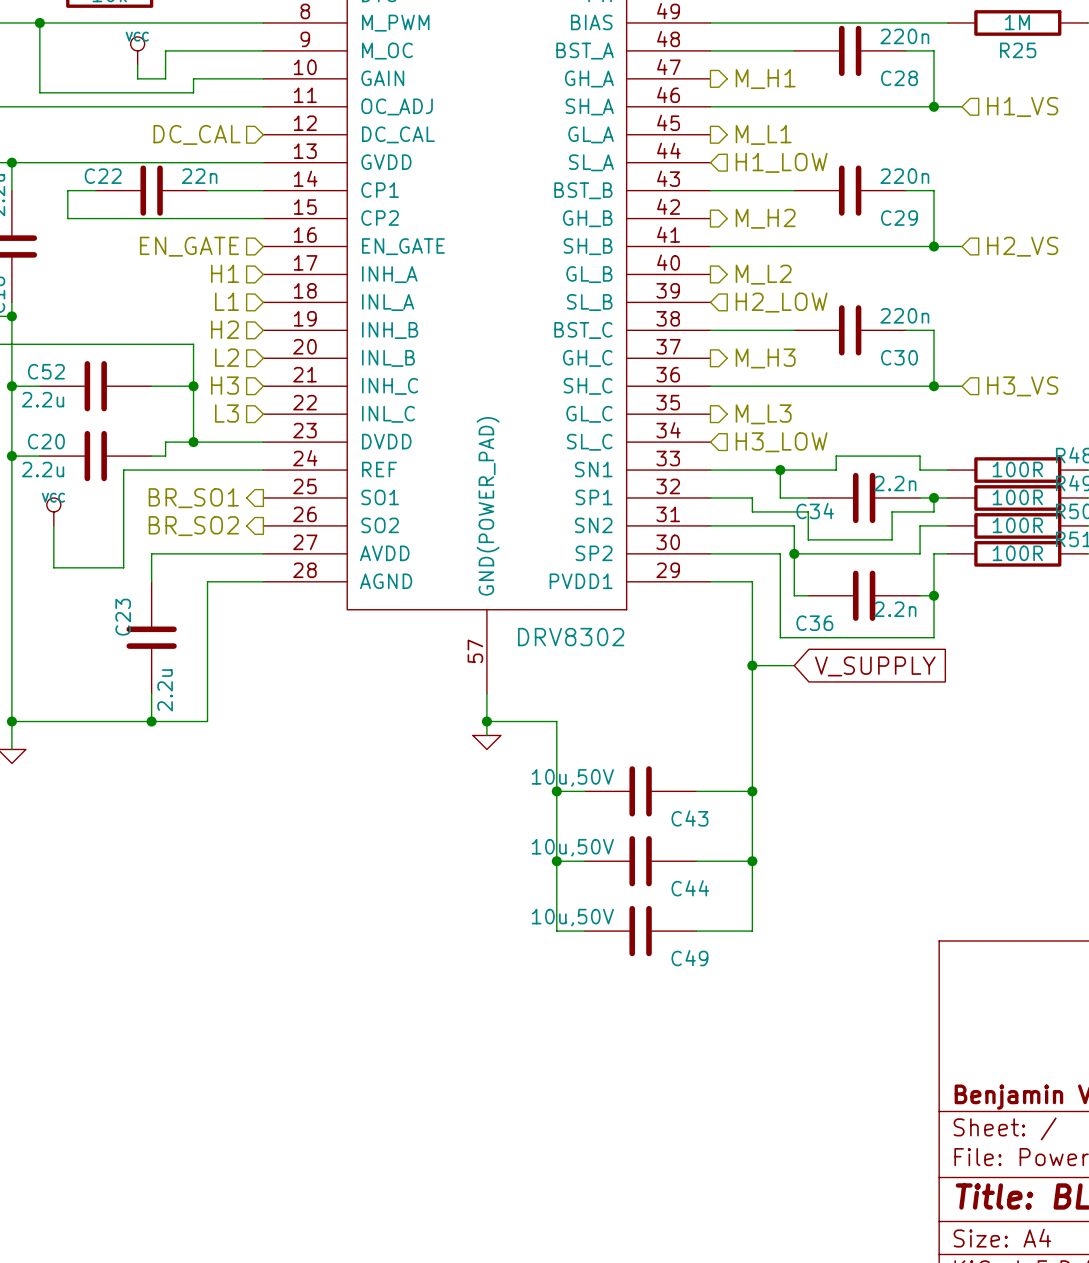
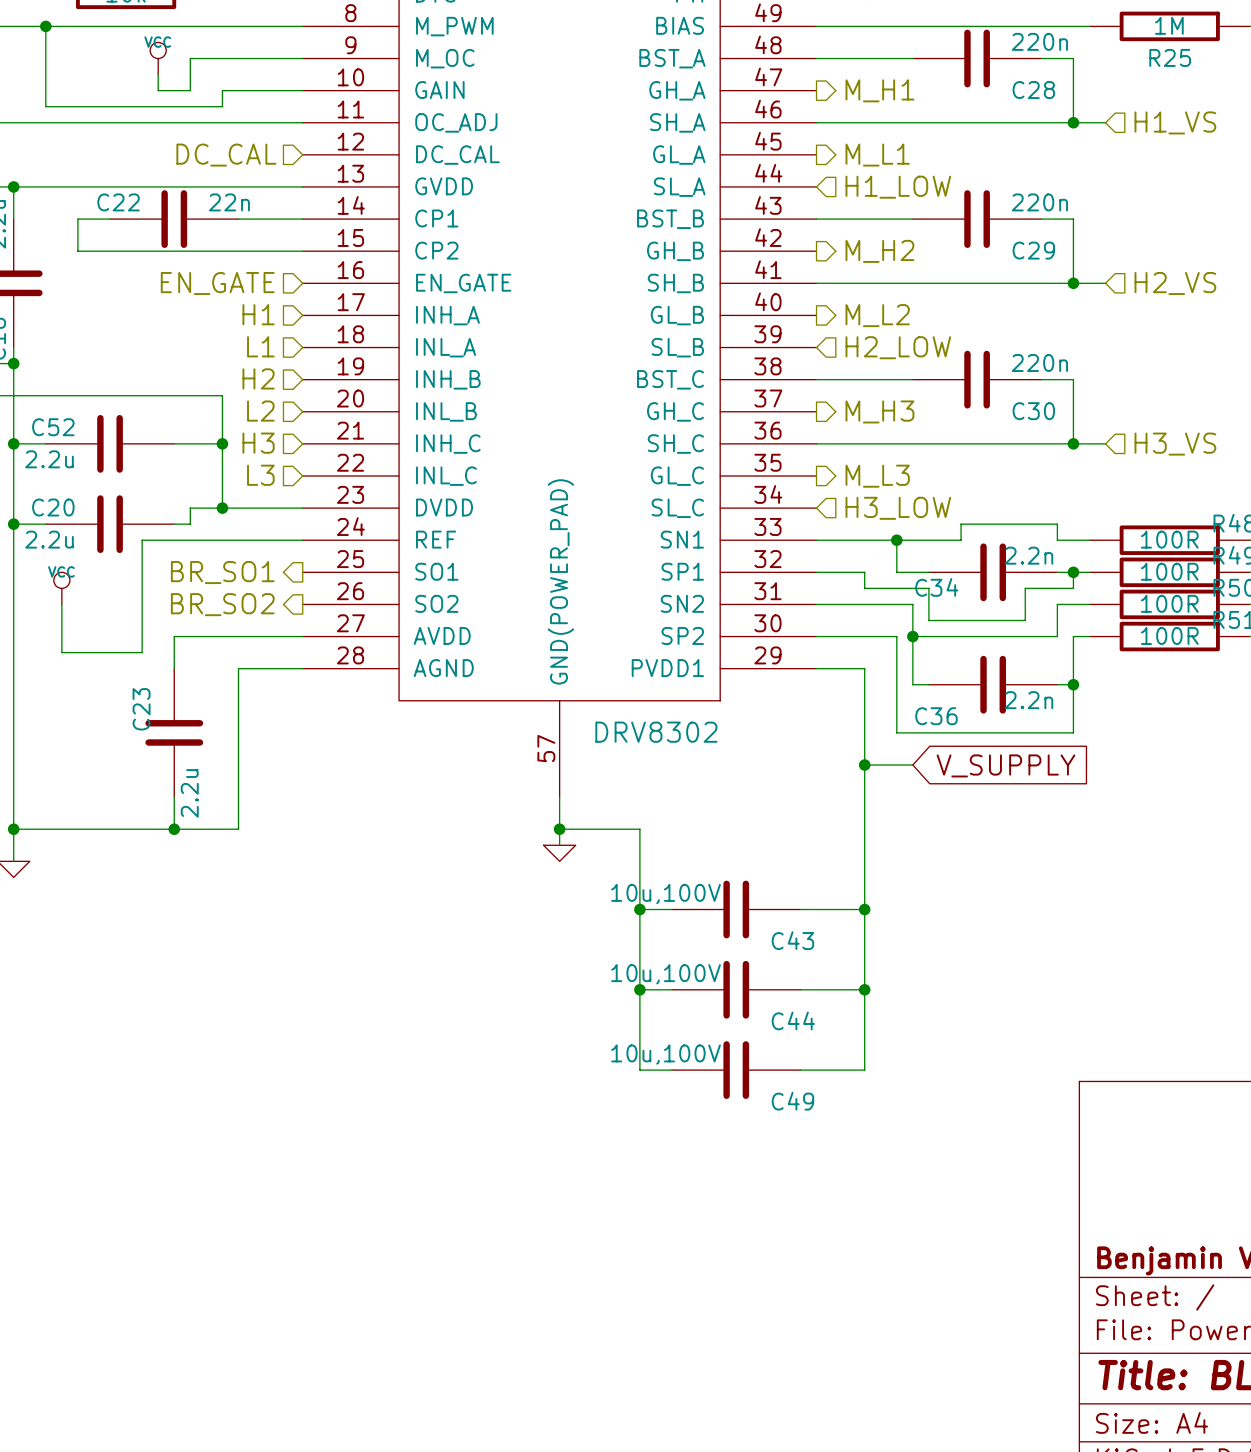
C43 value: 10u,50V (572, 777) -> 10u,100V (666, 894)
C44 value: 10u,50V (572, 847) -> 10u,100V (666, 974)
C49 value: 10u,50V (572, 917) -> 10u,100V (666, 1054)

